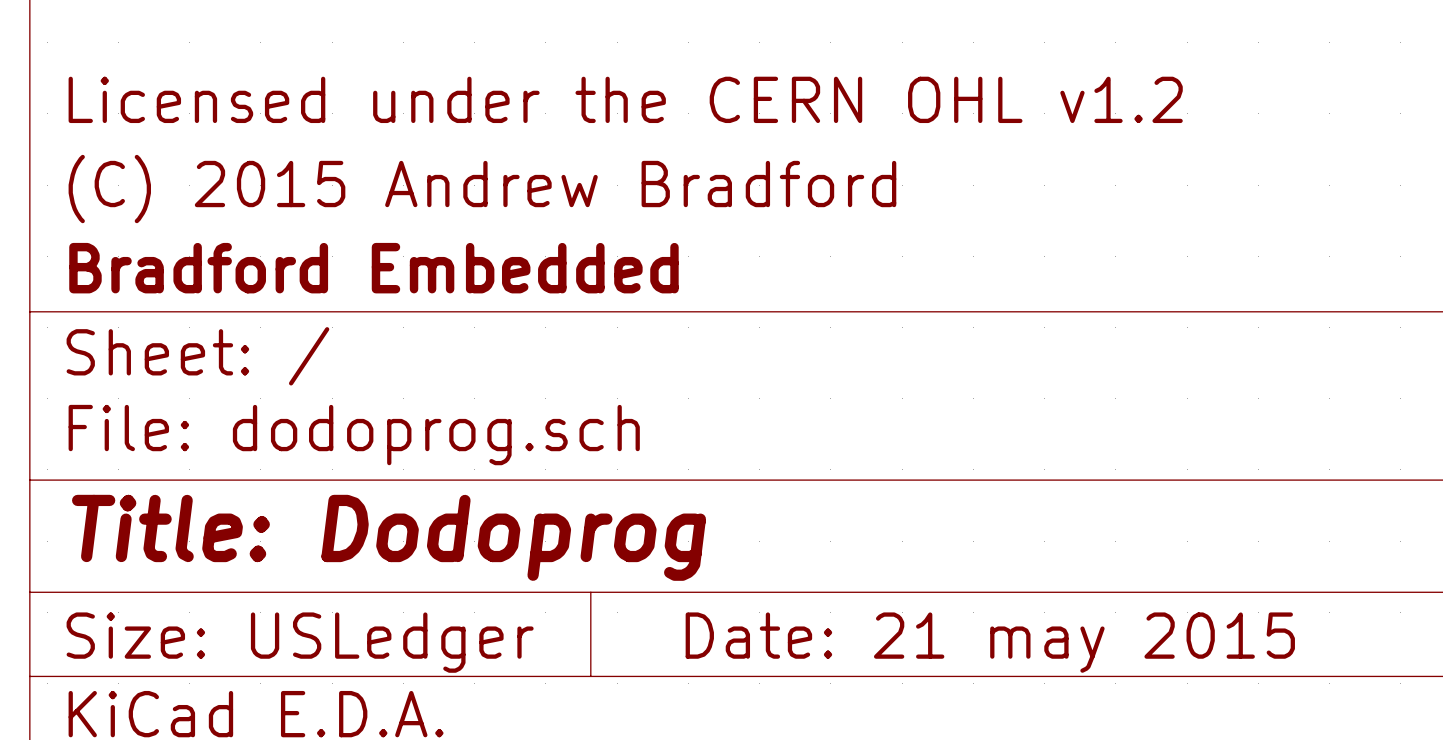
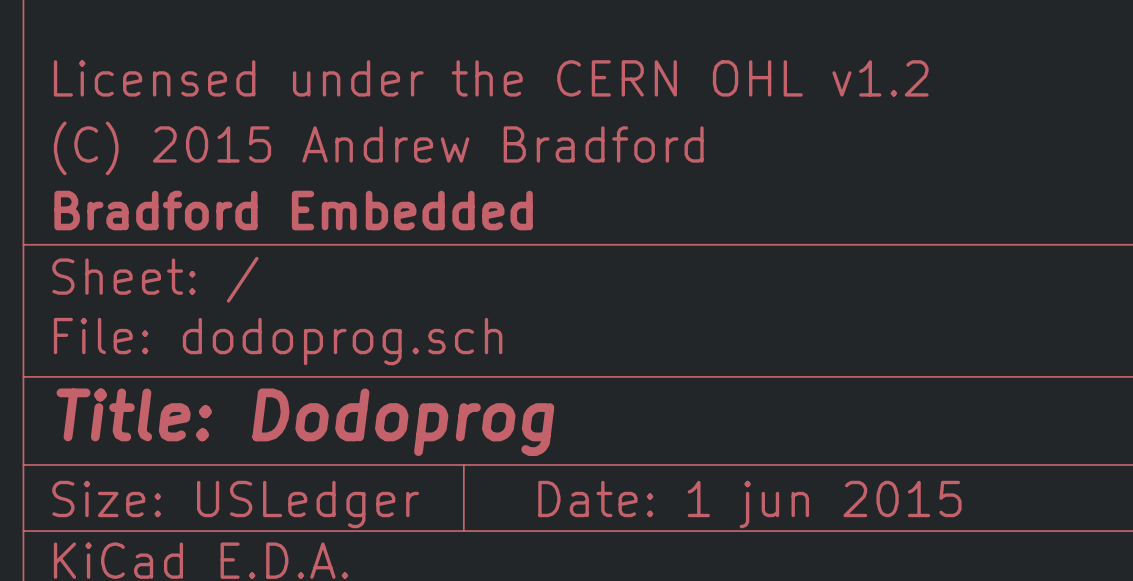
title block: Date: 21 may 2015 (990, 642) -> Date: 1 jun 2015 (749, 504)

